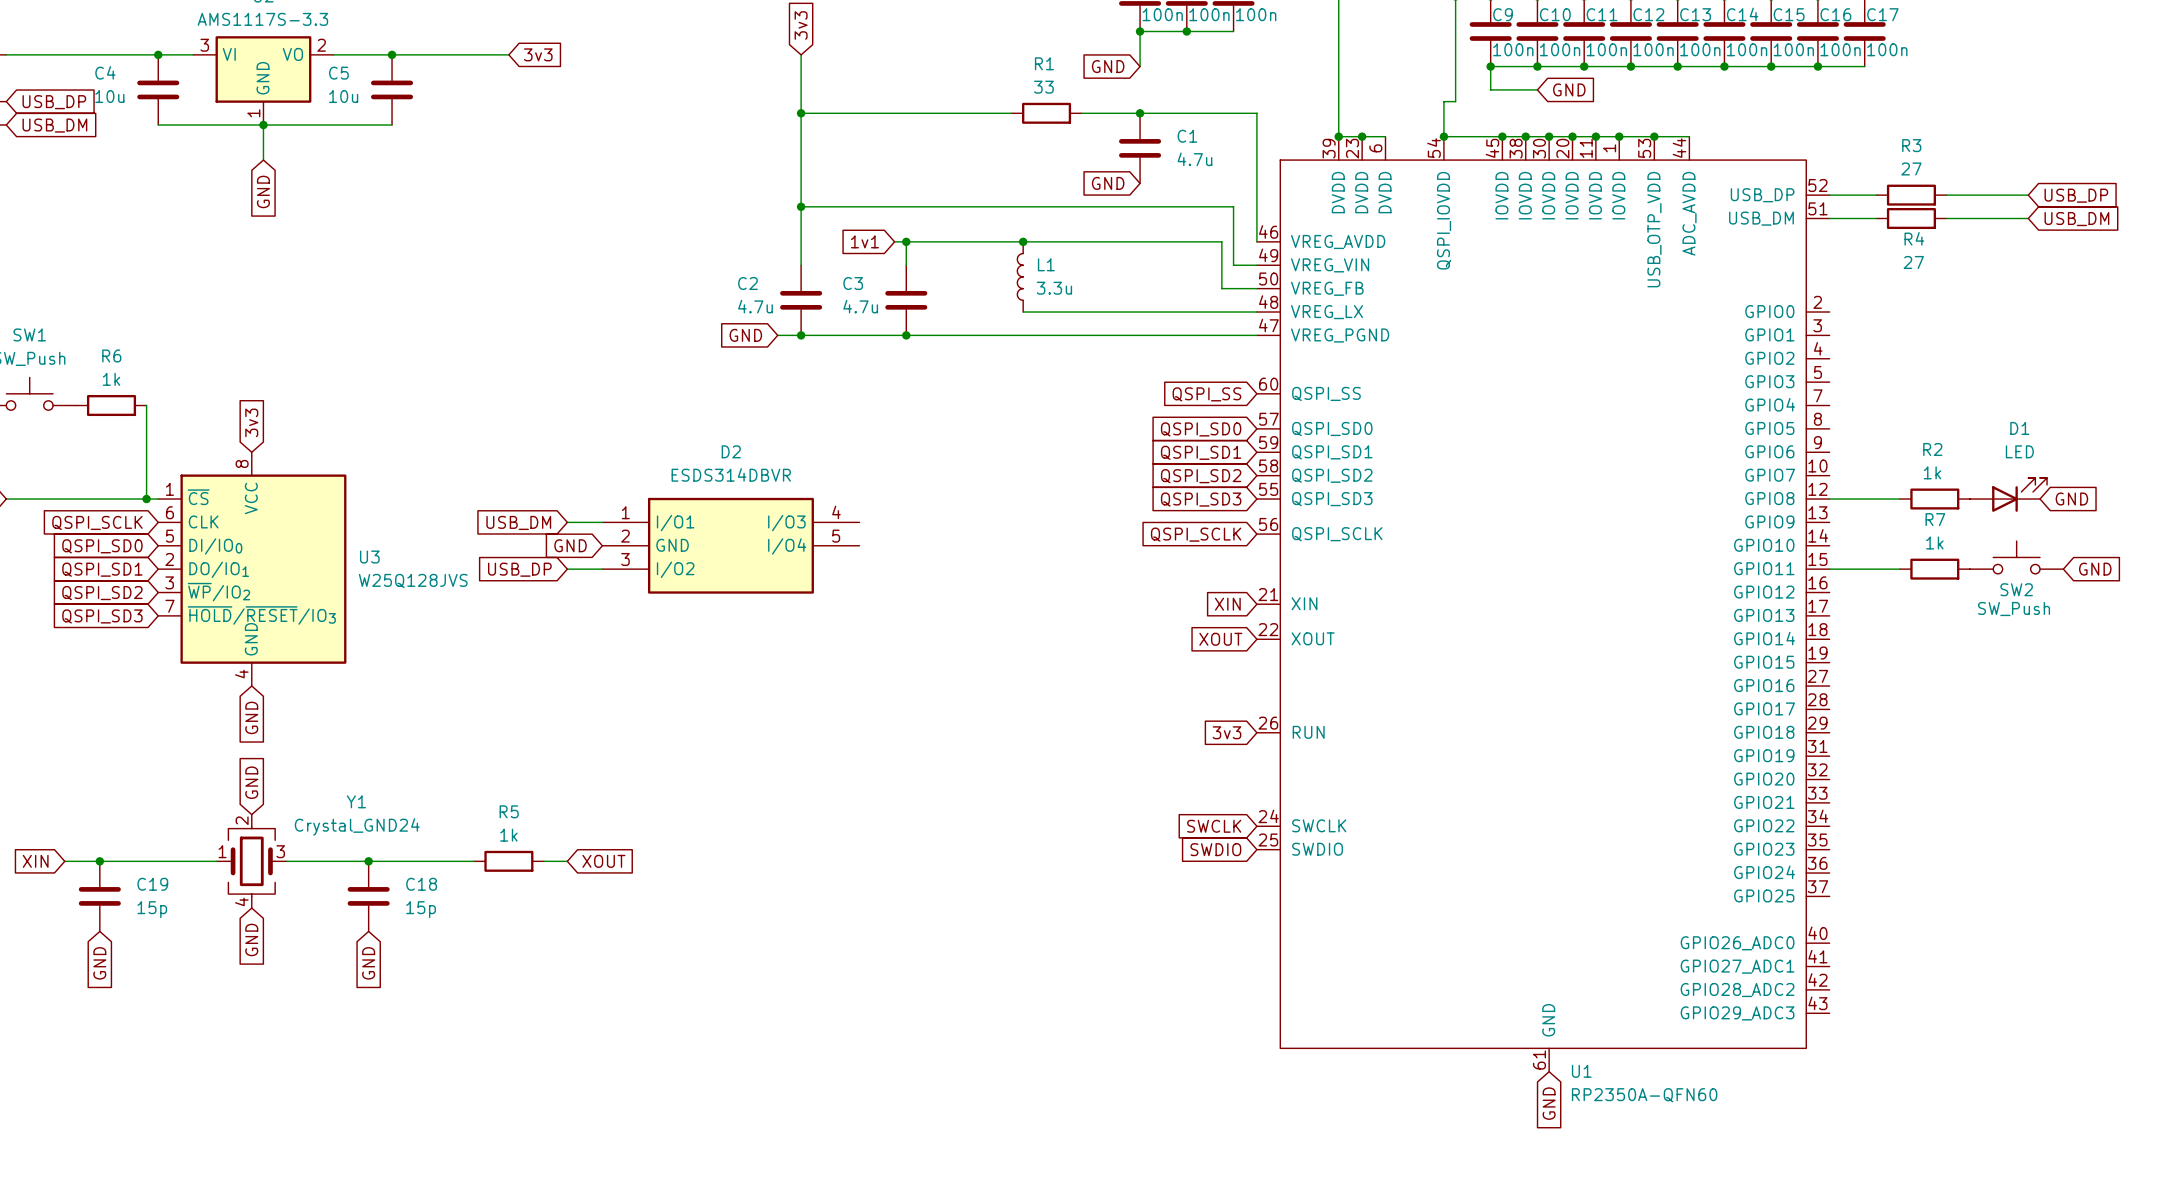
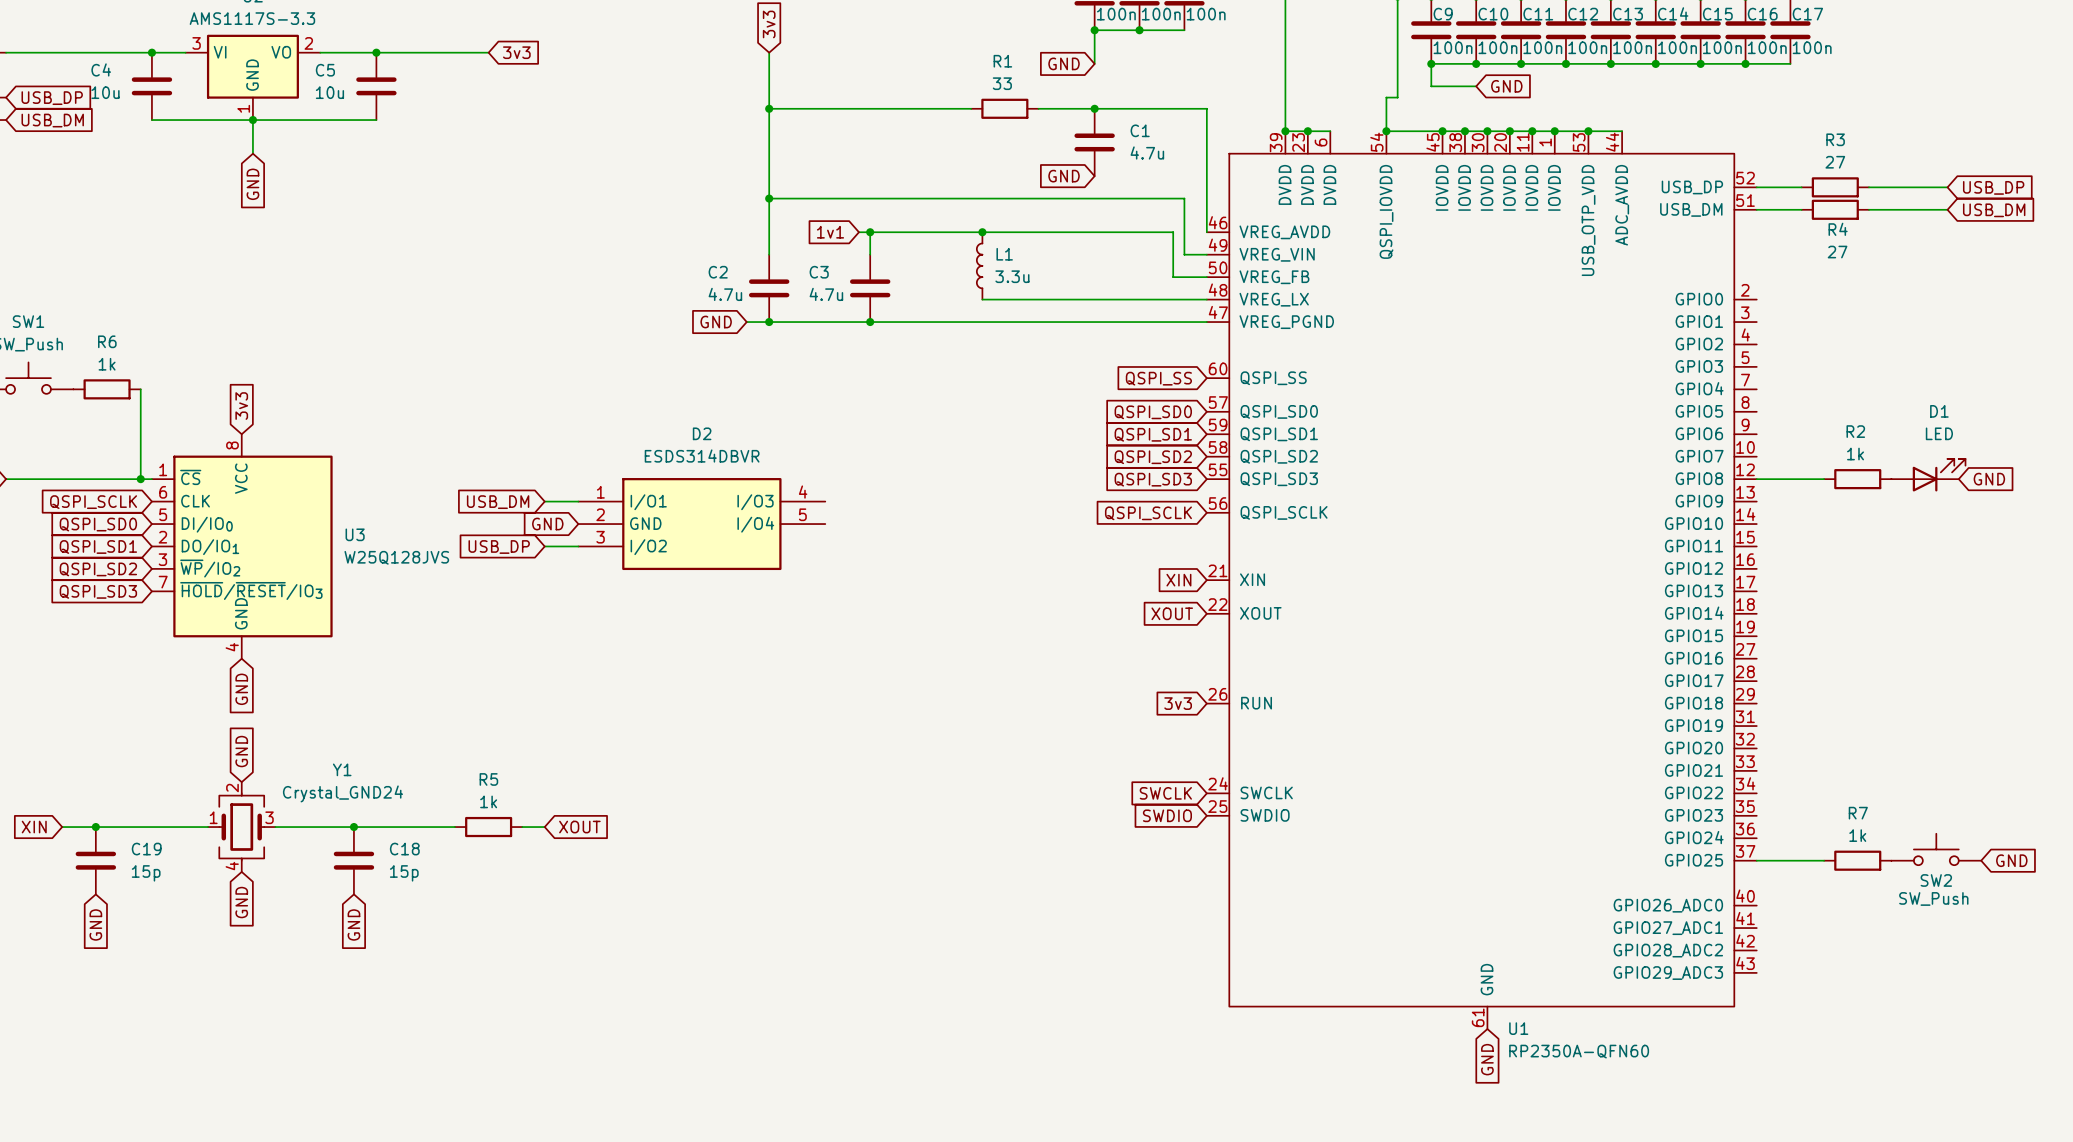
SW2 position: (2016, 557) -> (1936, 849)
wire: (1829, 569) (1899, 569) -> none
R7 position: (1934, 569) -> (1857, 860)
global label: GND (2095, 569) -> none
wire: none -> (1756, 860) (1824, 860)
global label: none -> GND (2011, 860)

